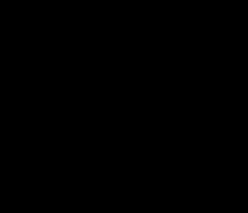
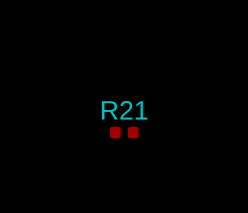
R21: none -> (124, 132)

